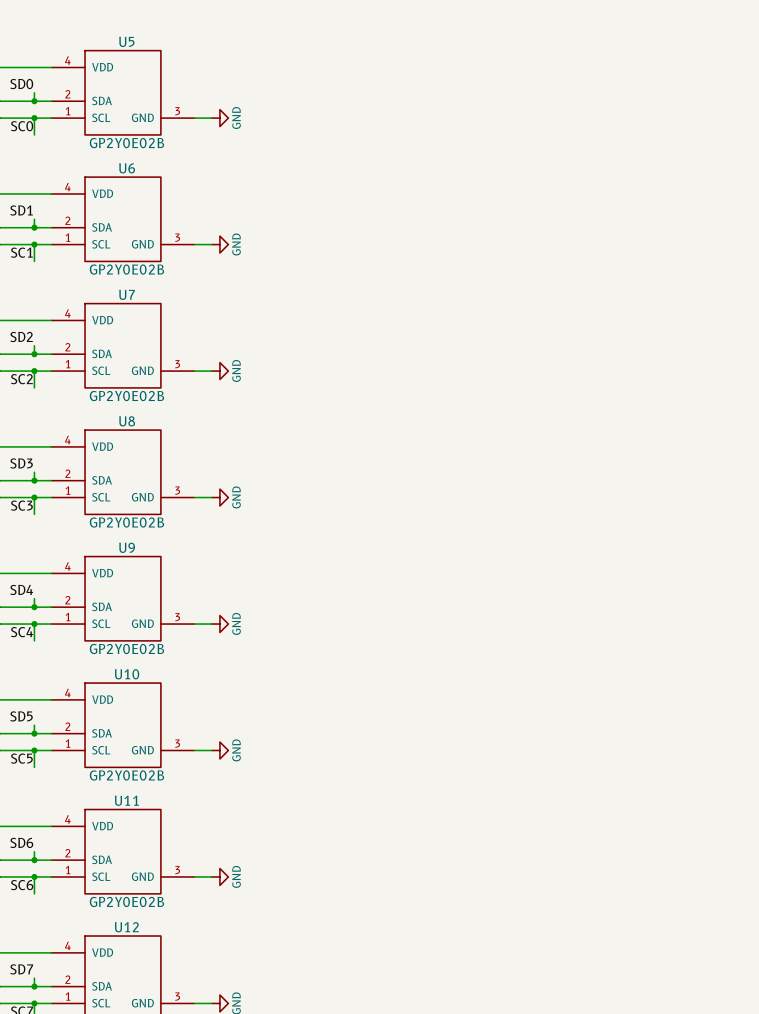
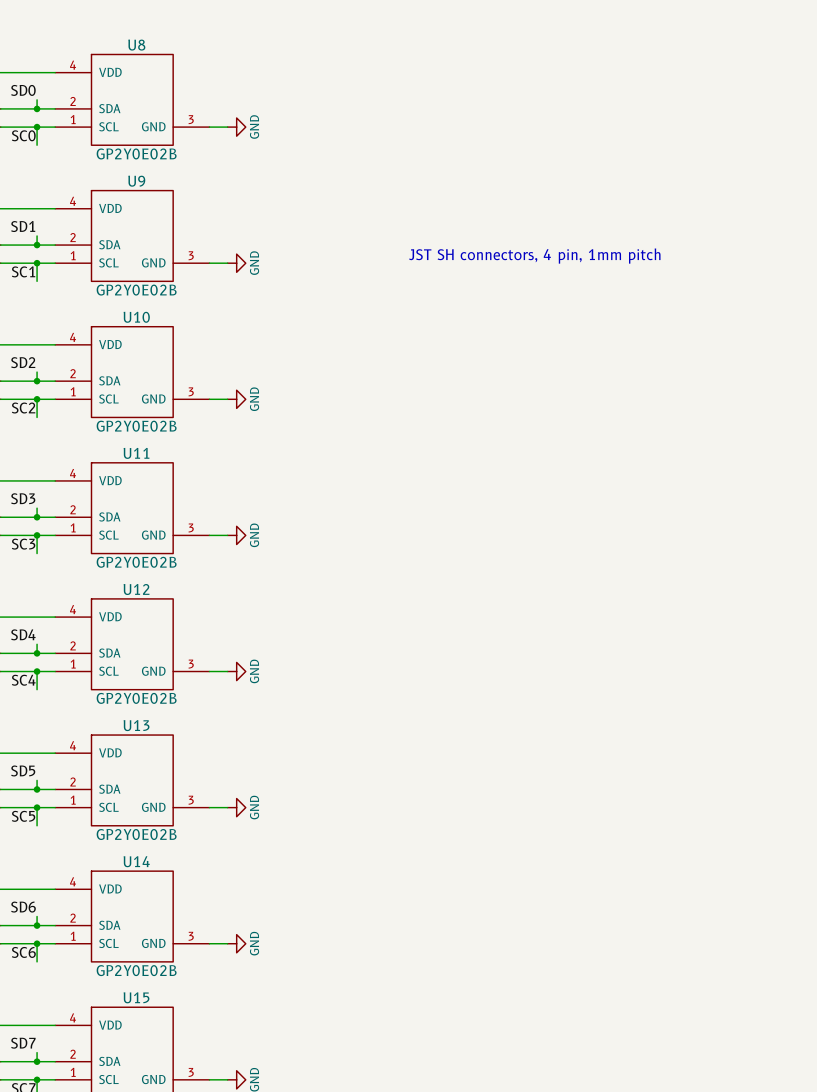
U5 name: U5 (126, 41) -> U8 (136, 45)
U6 name: U6 (127, 168) -> U9 (136, 181)
text: none -> JST SH connectors, 4 pin, 1mm pitch (534, 256)
U7 name: U7 (127, 294) -> U10 (136, 317)
U8 name: U8 (127, 421) -> U11 (136, 453)
U9 name: U9 (127, 547) -> U12 (136, 589)
U10 name: U10 (127, 674) -> U13 (136, 725)
U11 name: U11 (126, 800) -> U14 (136, 861)
U12 name: U12 (126, 927) -> U15 (136, 997)

